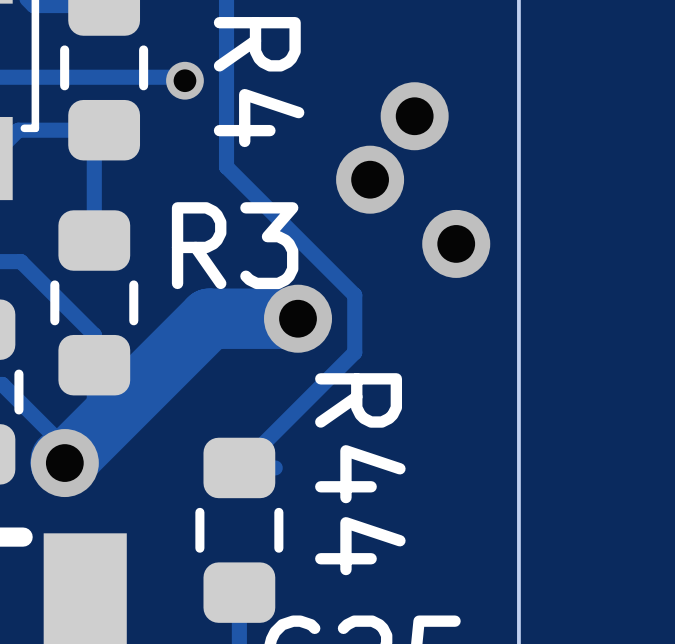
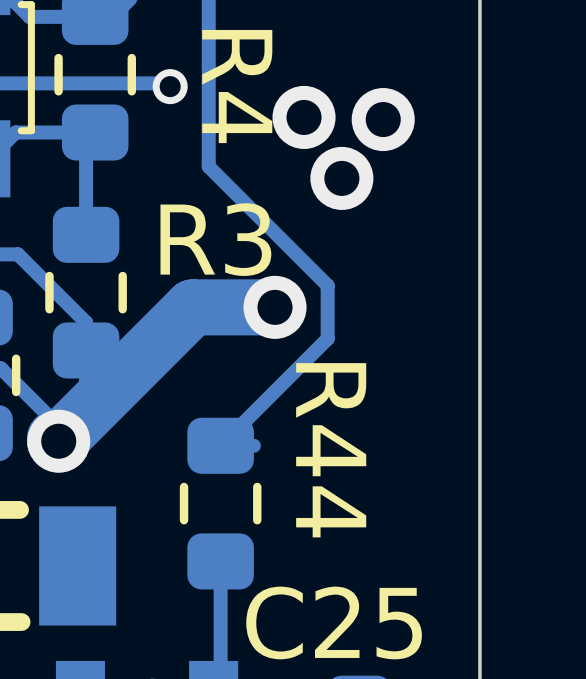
via position: (456, 243) -> (304, 117)

